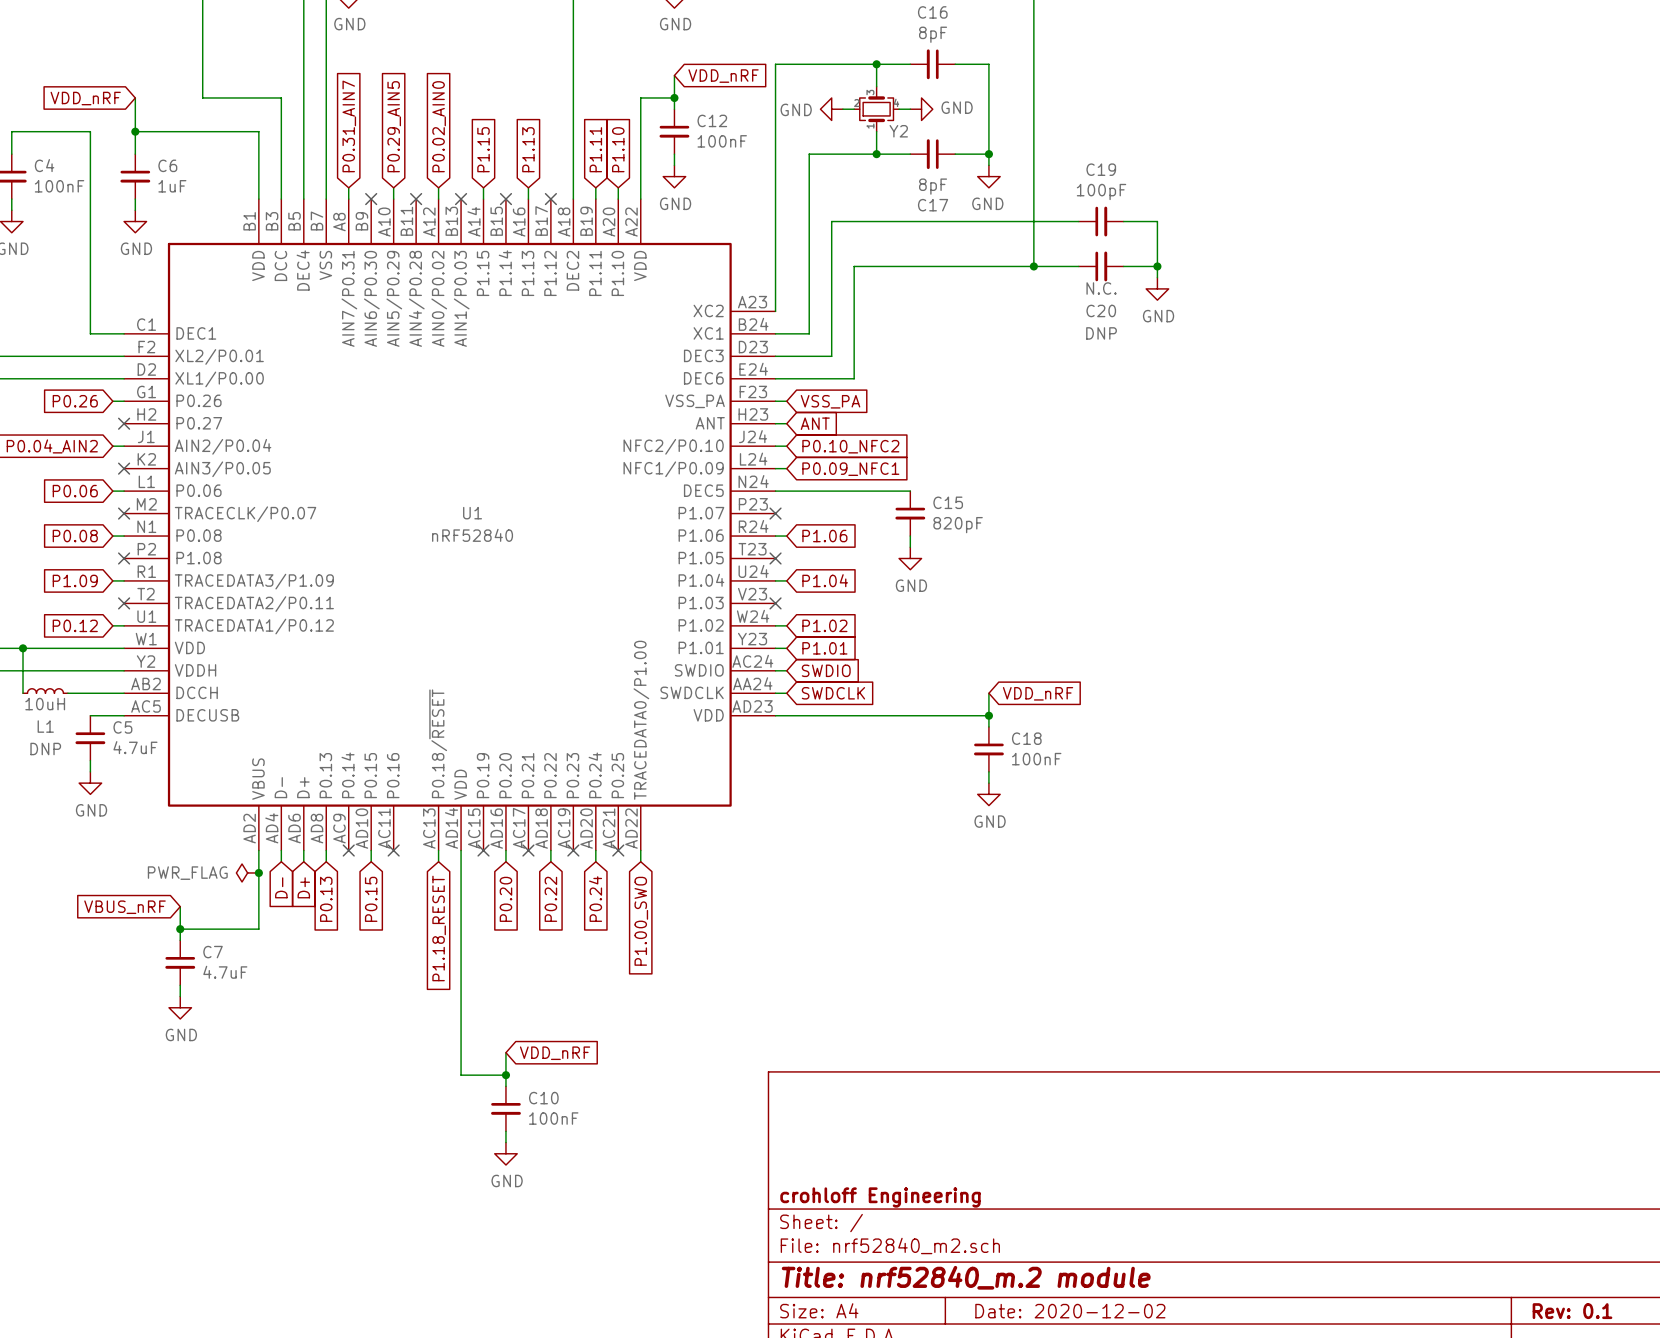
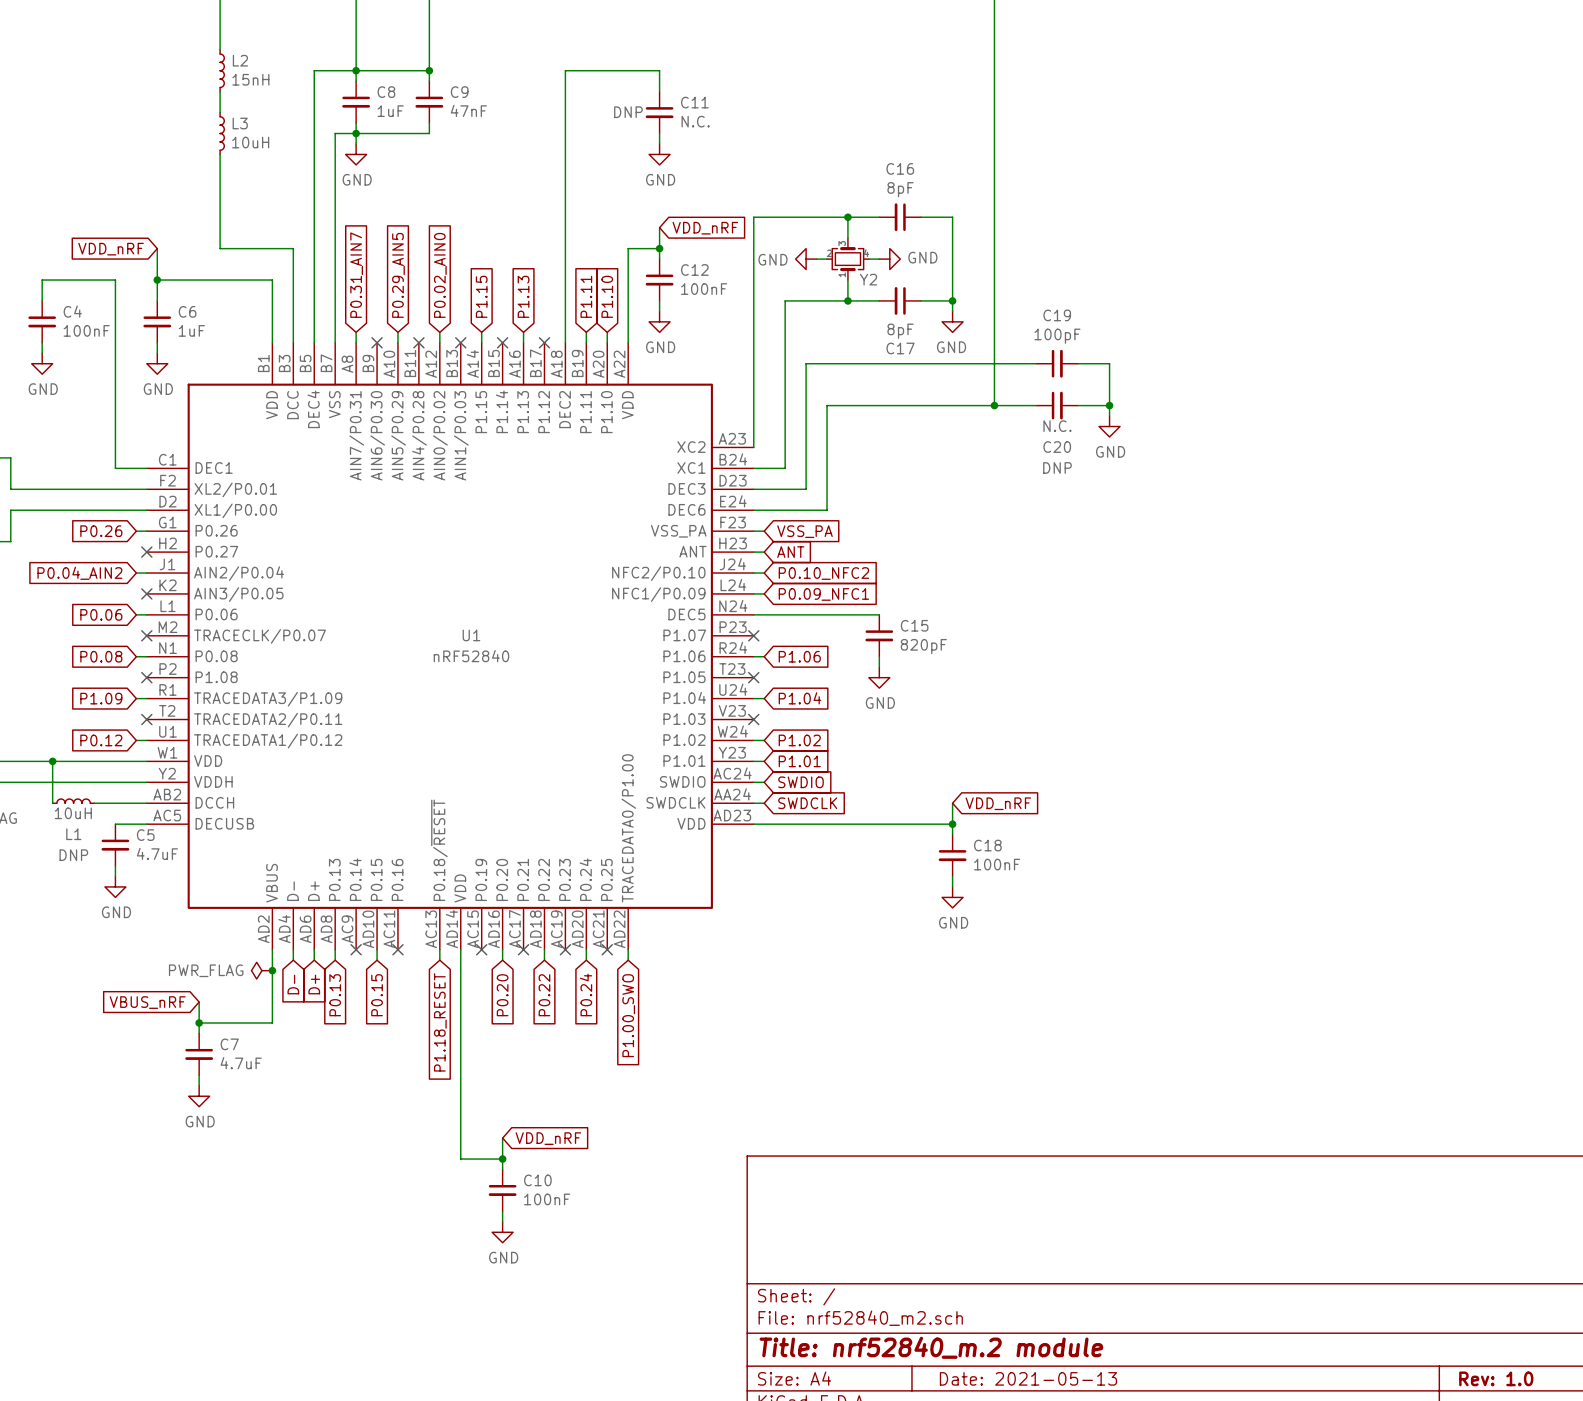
title block: crohloff Engineering (880, 1197) -> none
title block: Date: 2020-12-02 (1070, 1311) -> Date: 2021-05-13 (1028, 1378)
title block: Rev: 0.1 (1572, 1311) -> Rev: 1.0 (1496, 1378)

